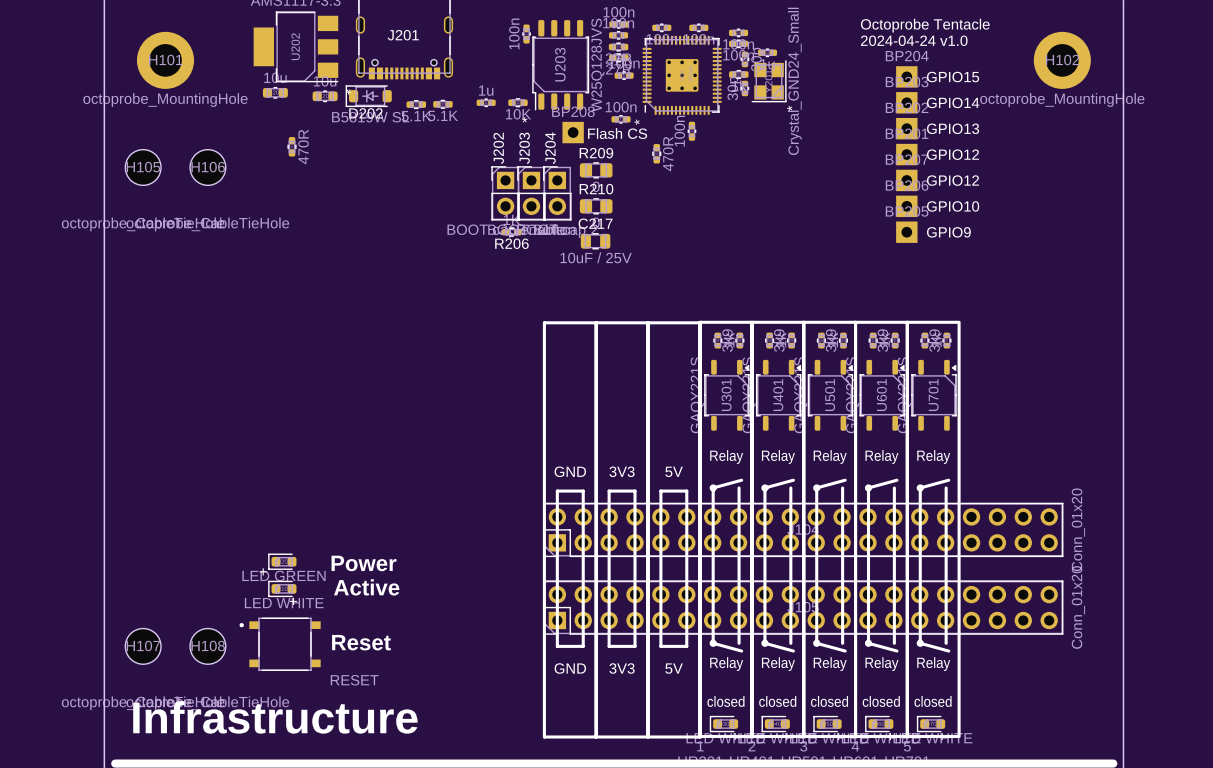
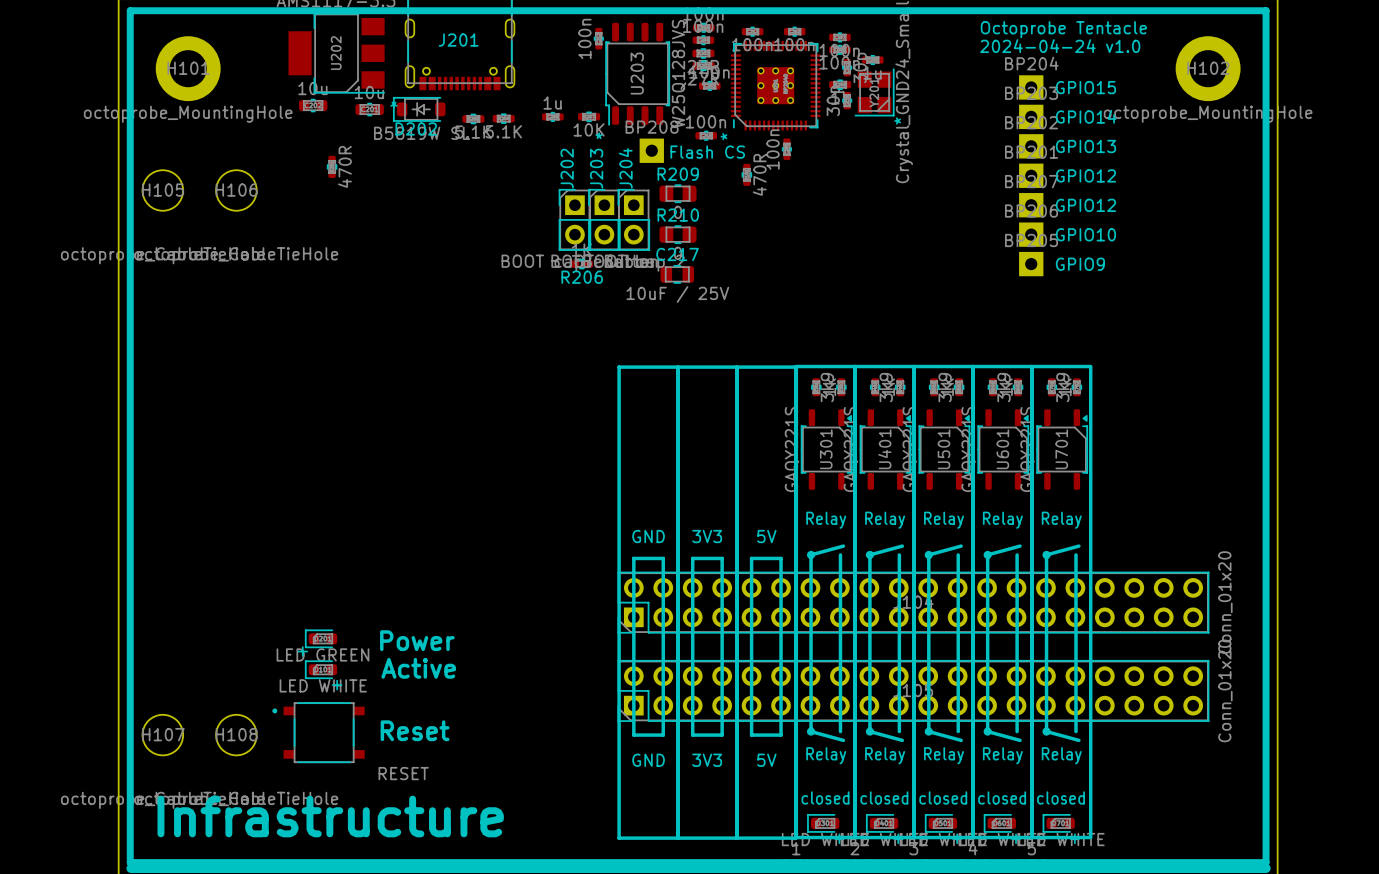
line: none -> (130, 10) (130, 862) (1266, 862) (1266, 10) (130, 10)

